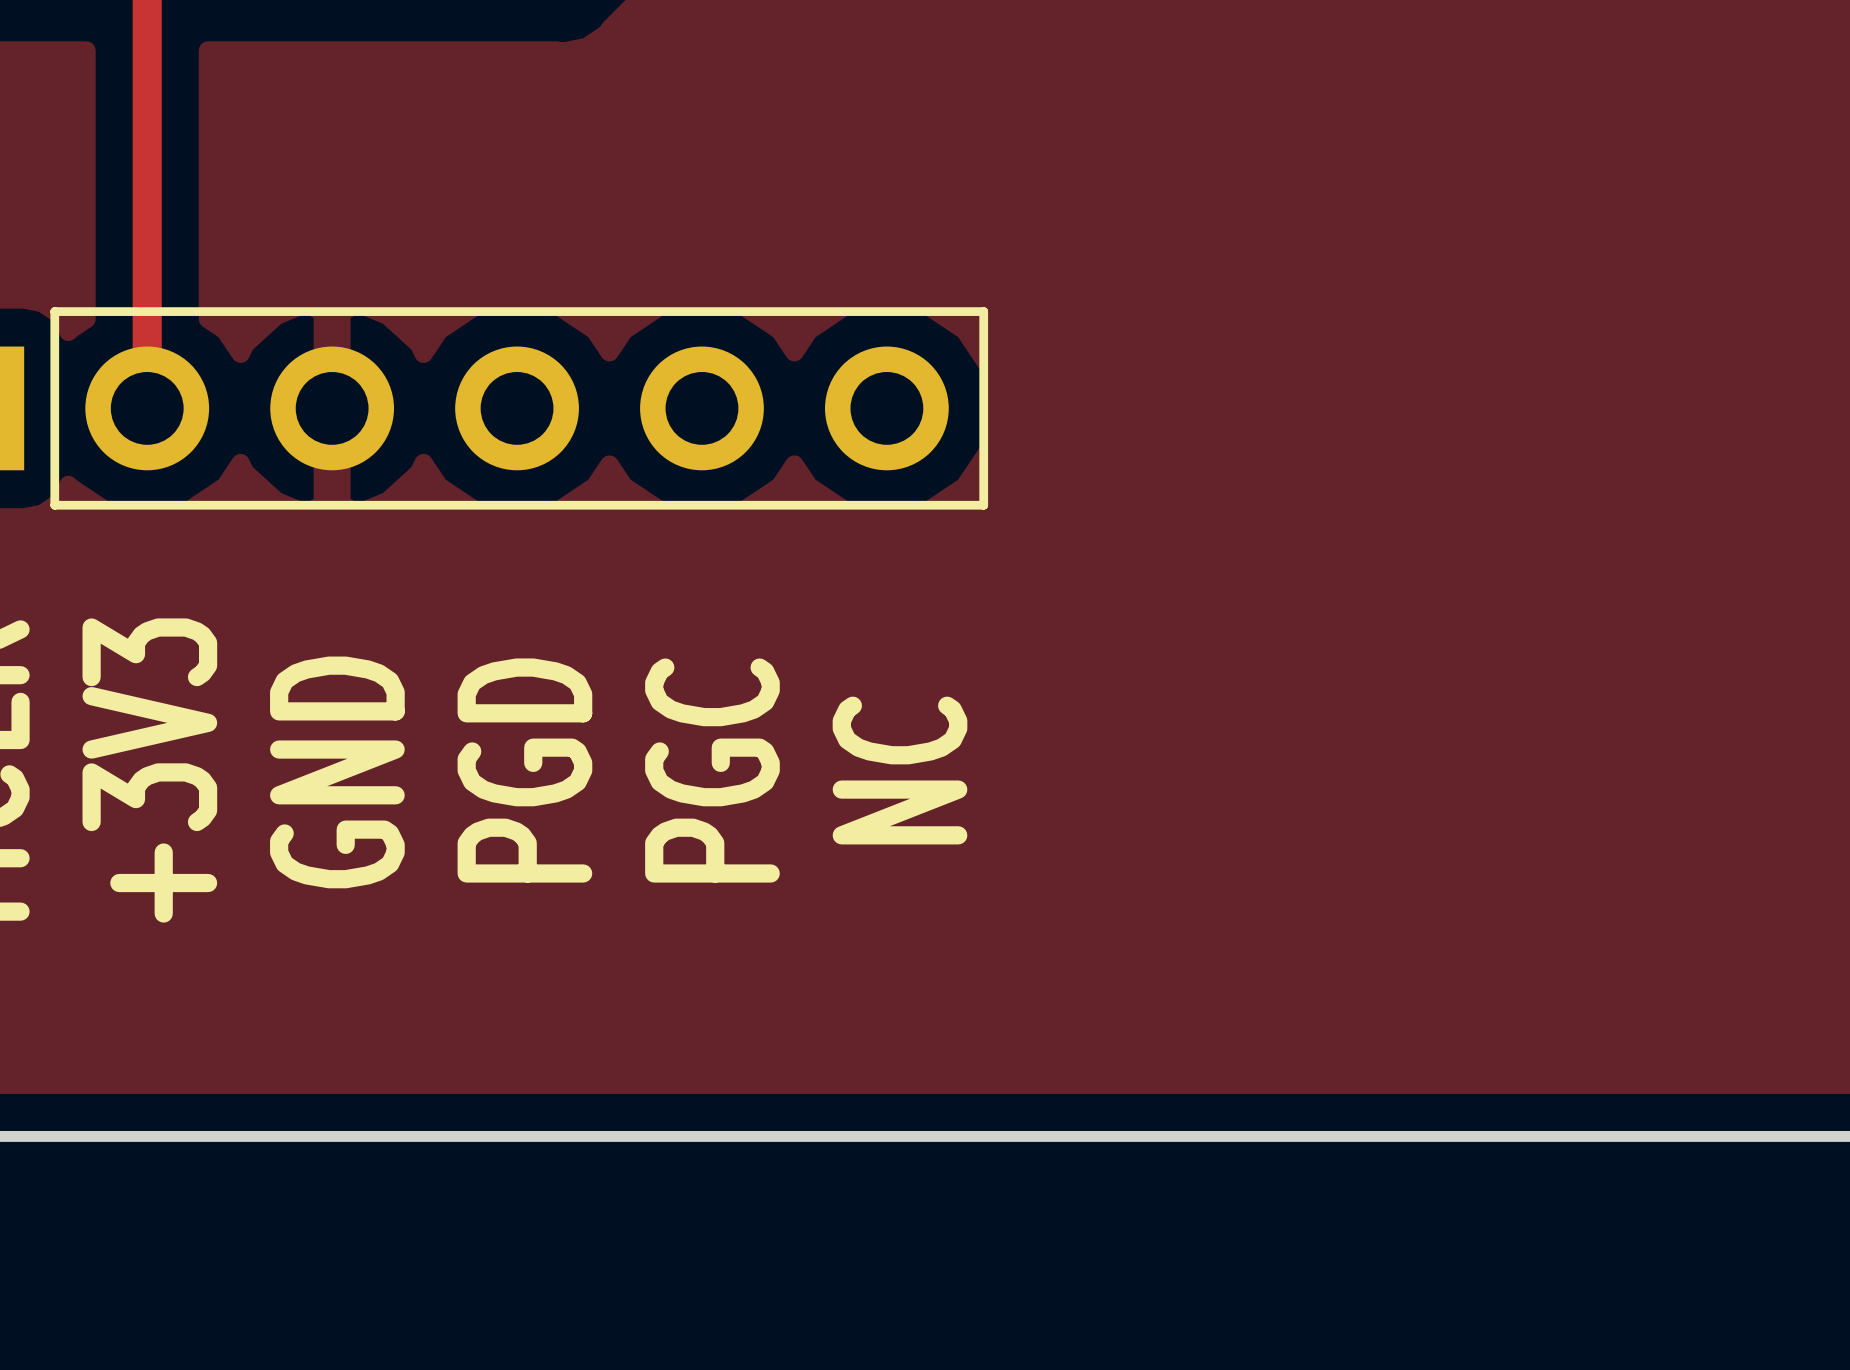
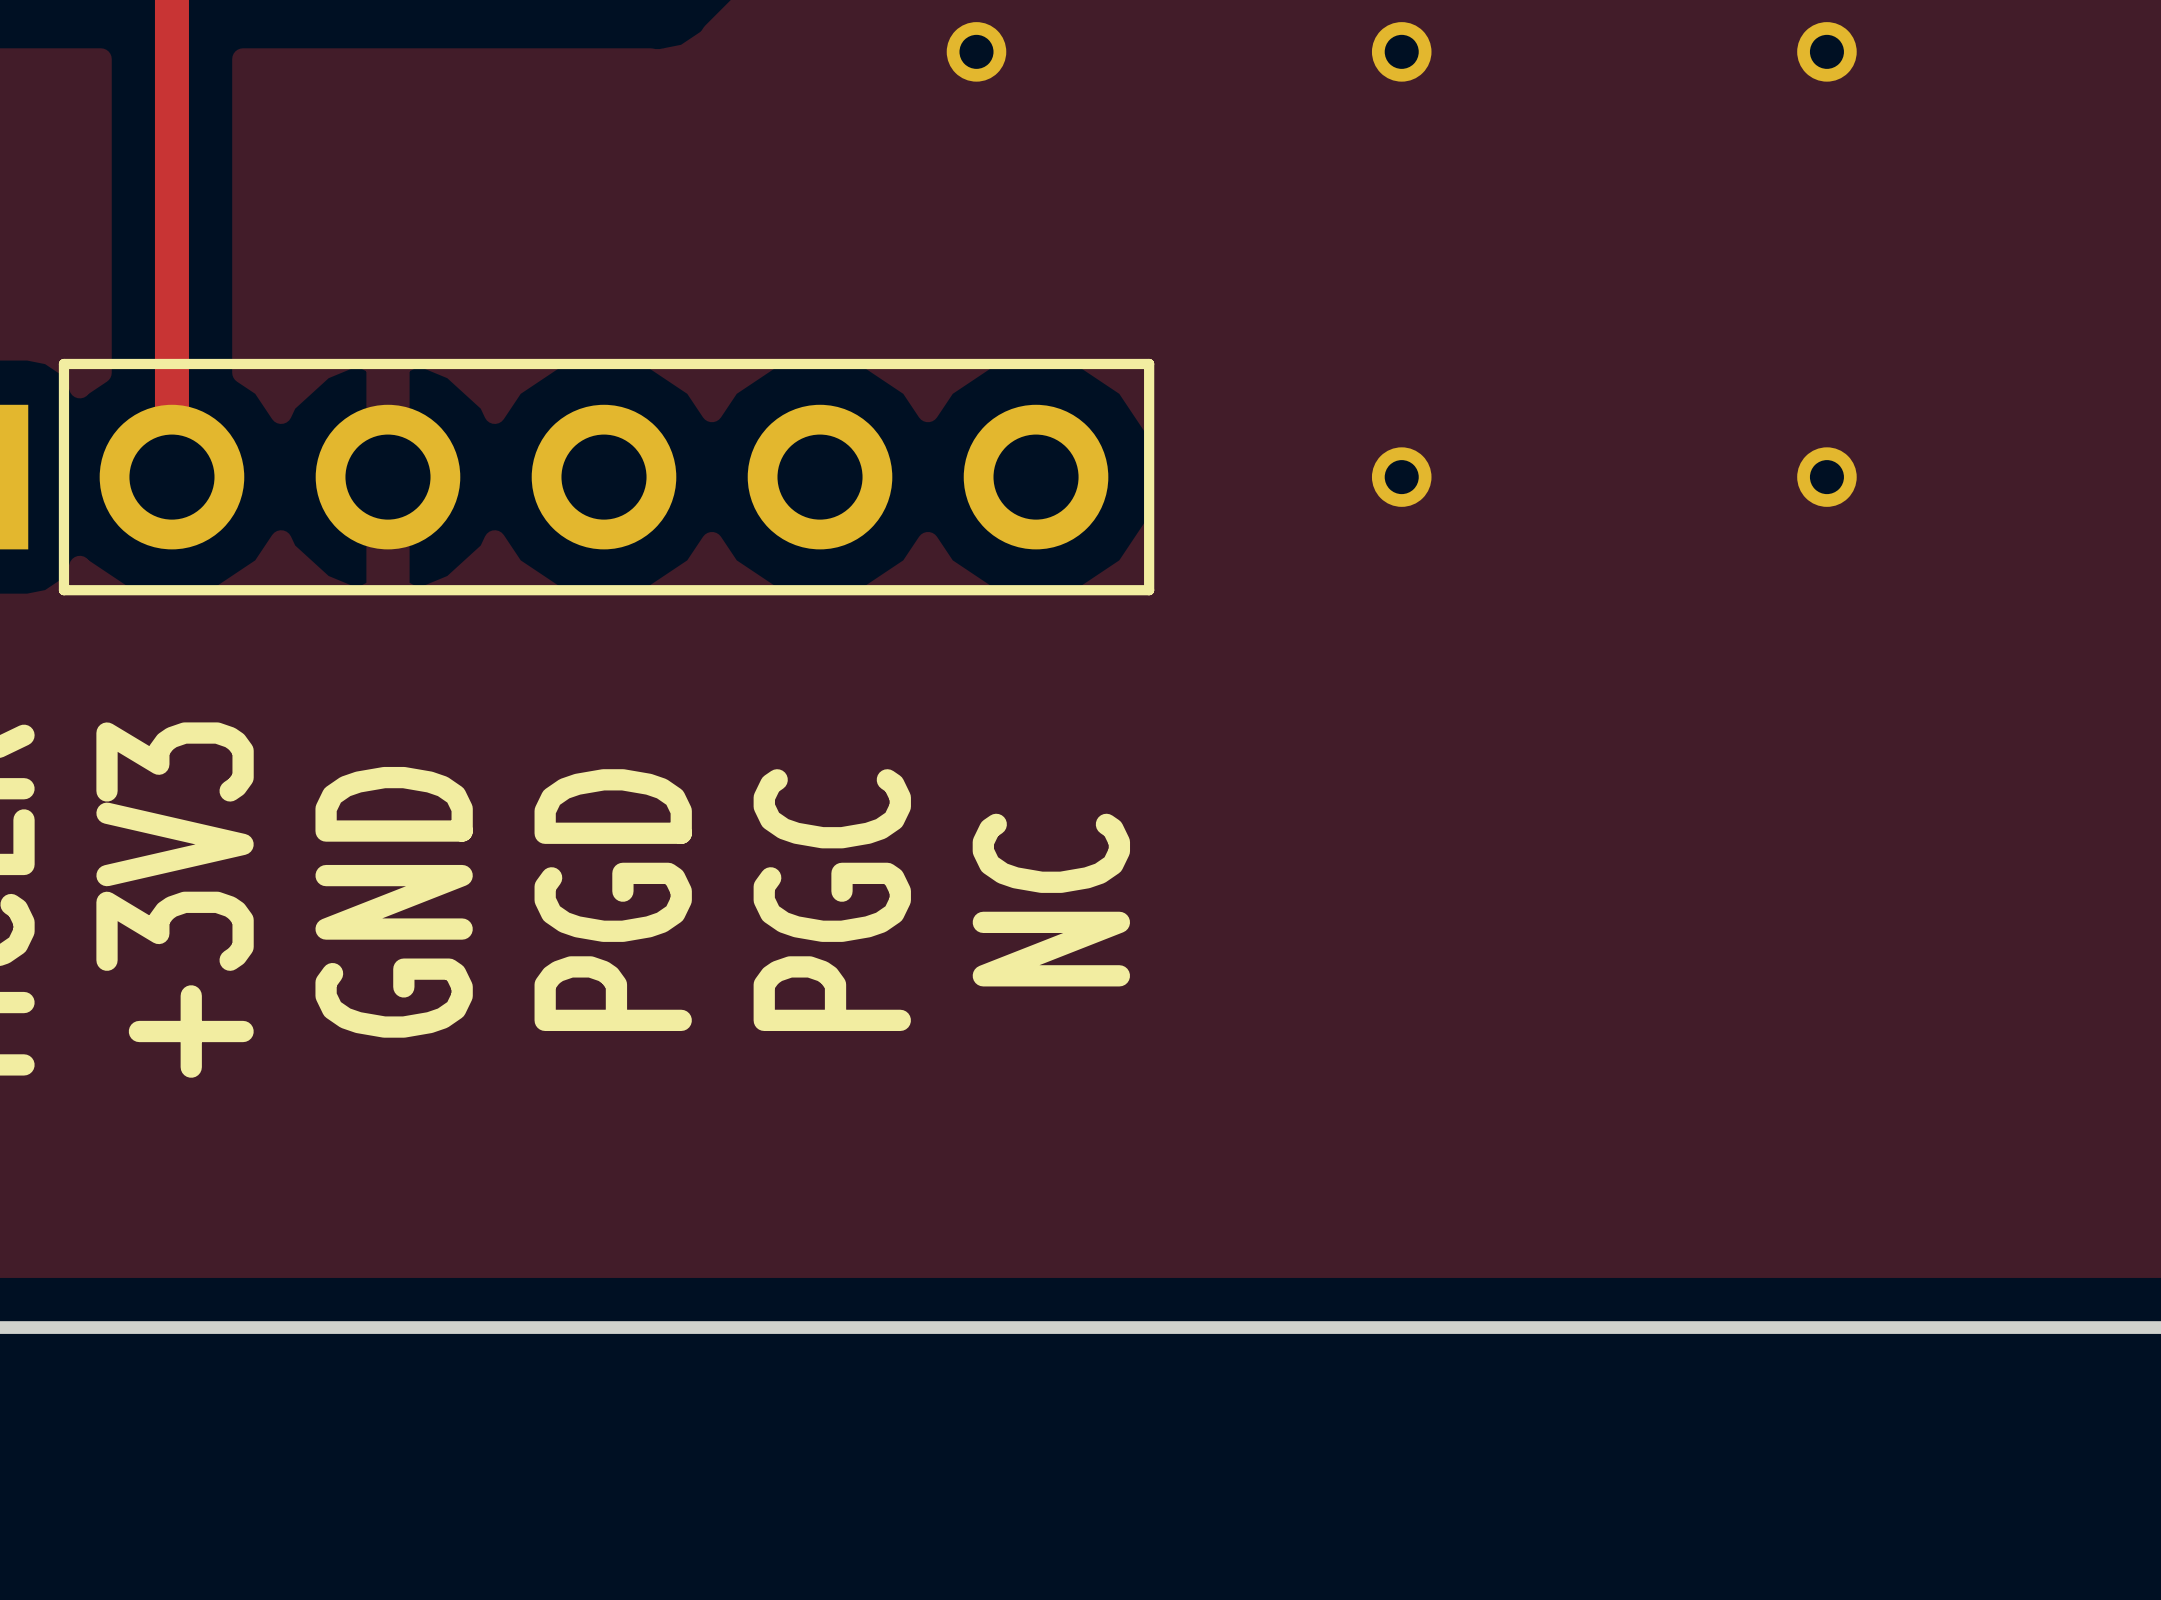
part: none -> (976, 51)
part: none -> (1401, 51)
part: none -> (1826, 51)
part: none -> (1401, 477)
part: none -> (1826, 477)

